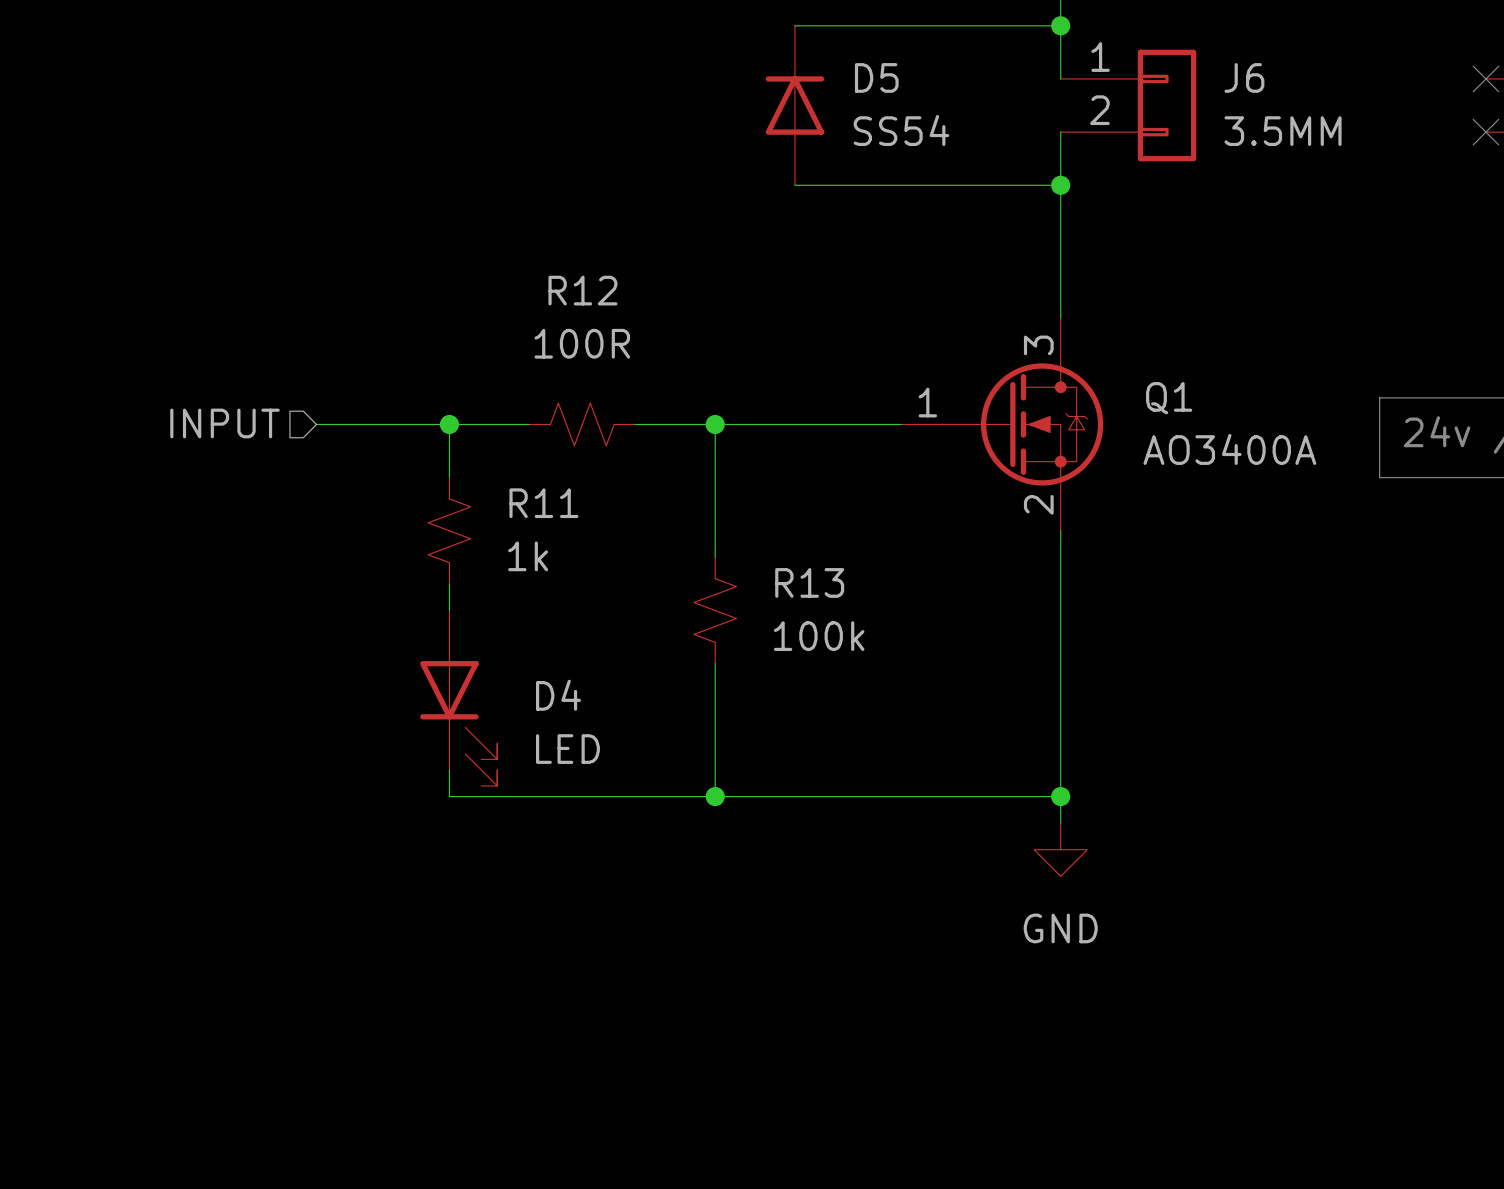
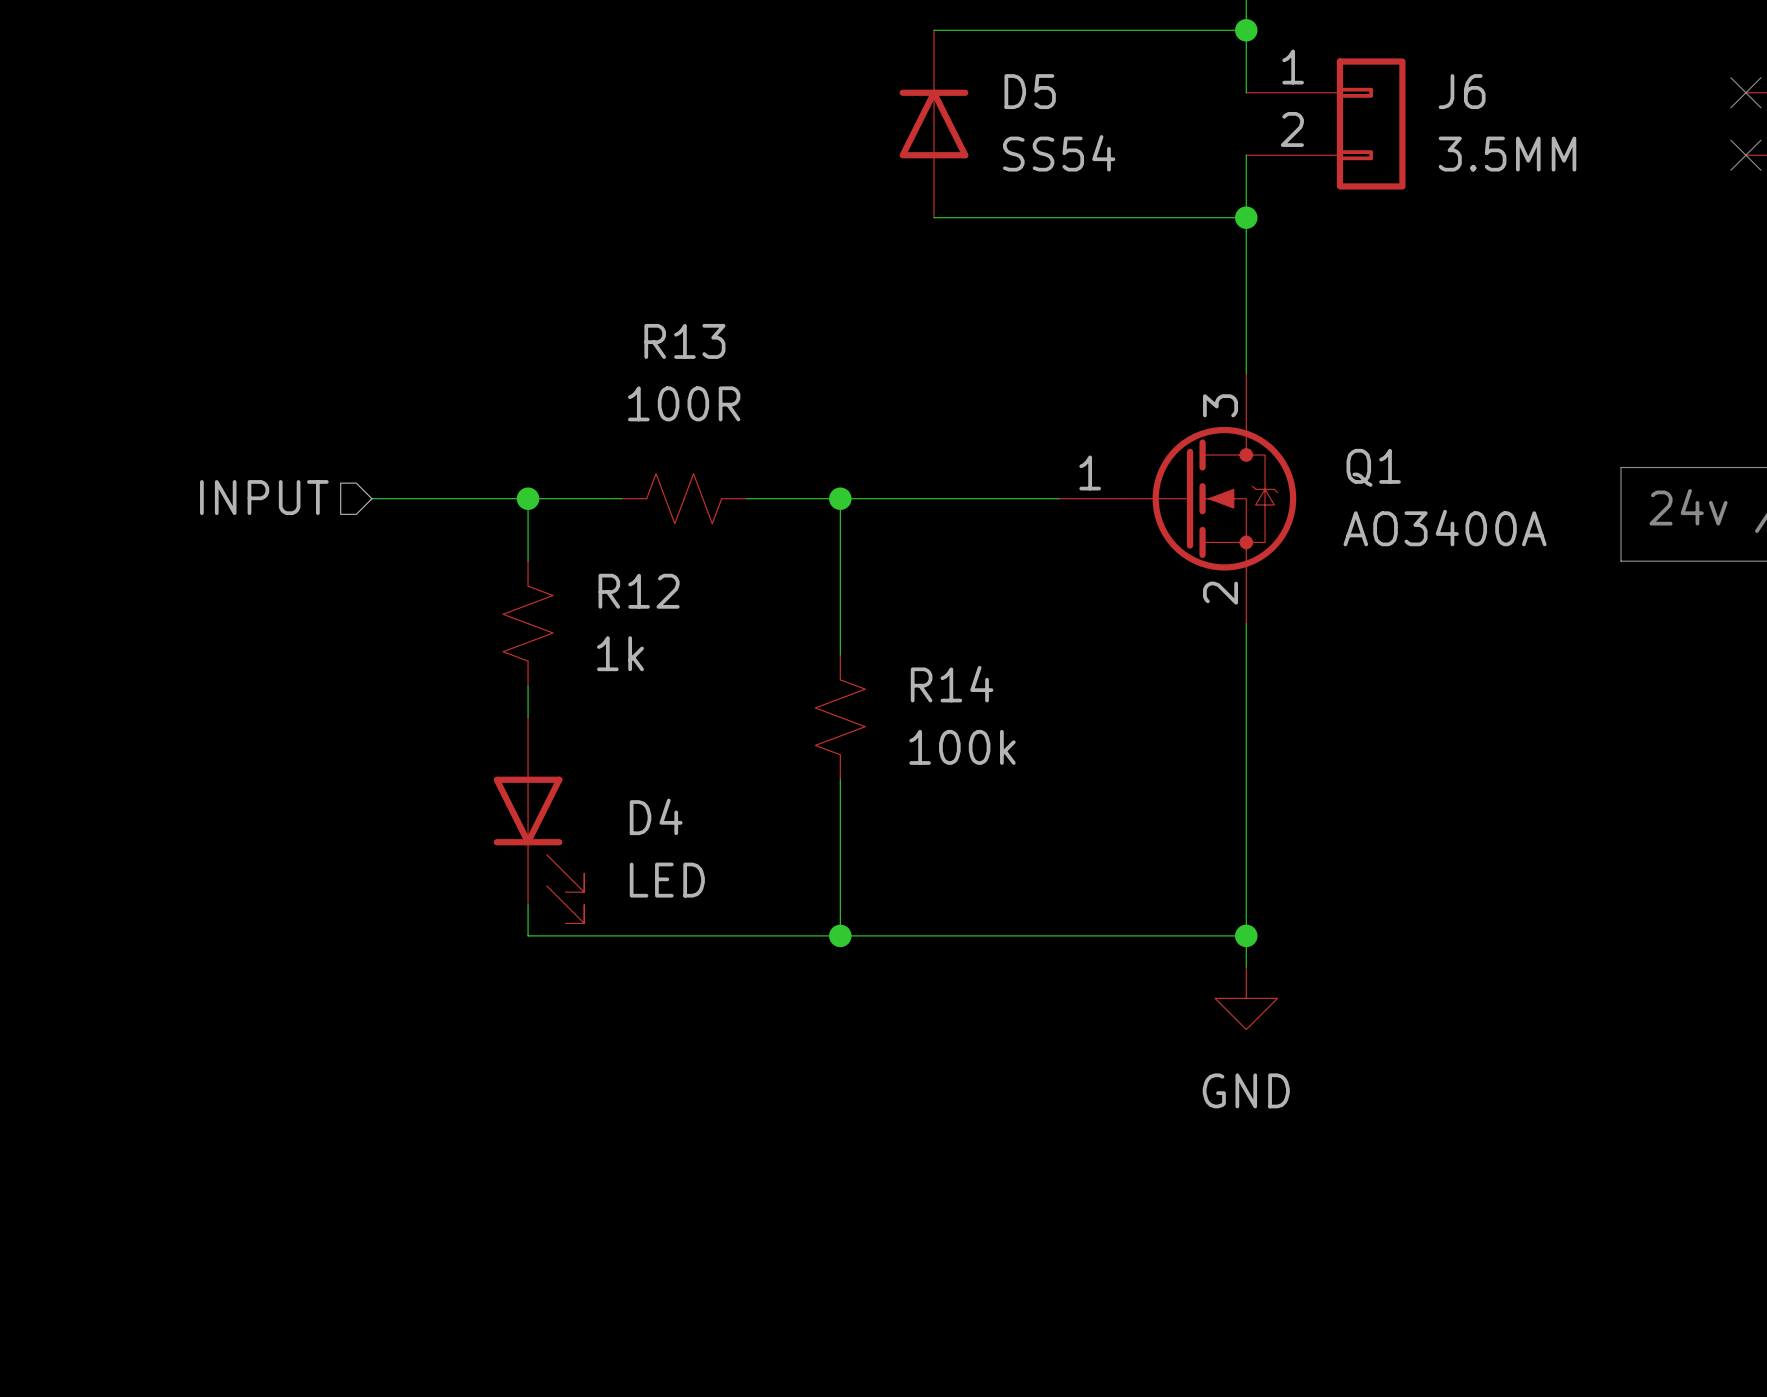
R12 name: R12 (582, 290) -> R13 (684, 341)
R11 name: R11 (543, 503) -> R12 (639, 591)
R13 name: R13 (809, 582) -> R14 (952, 684)

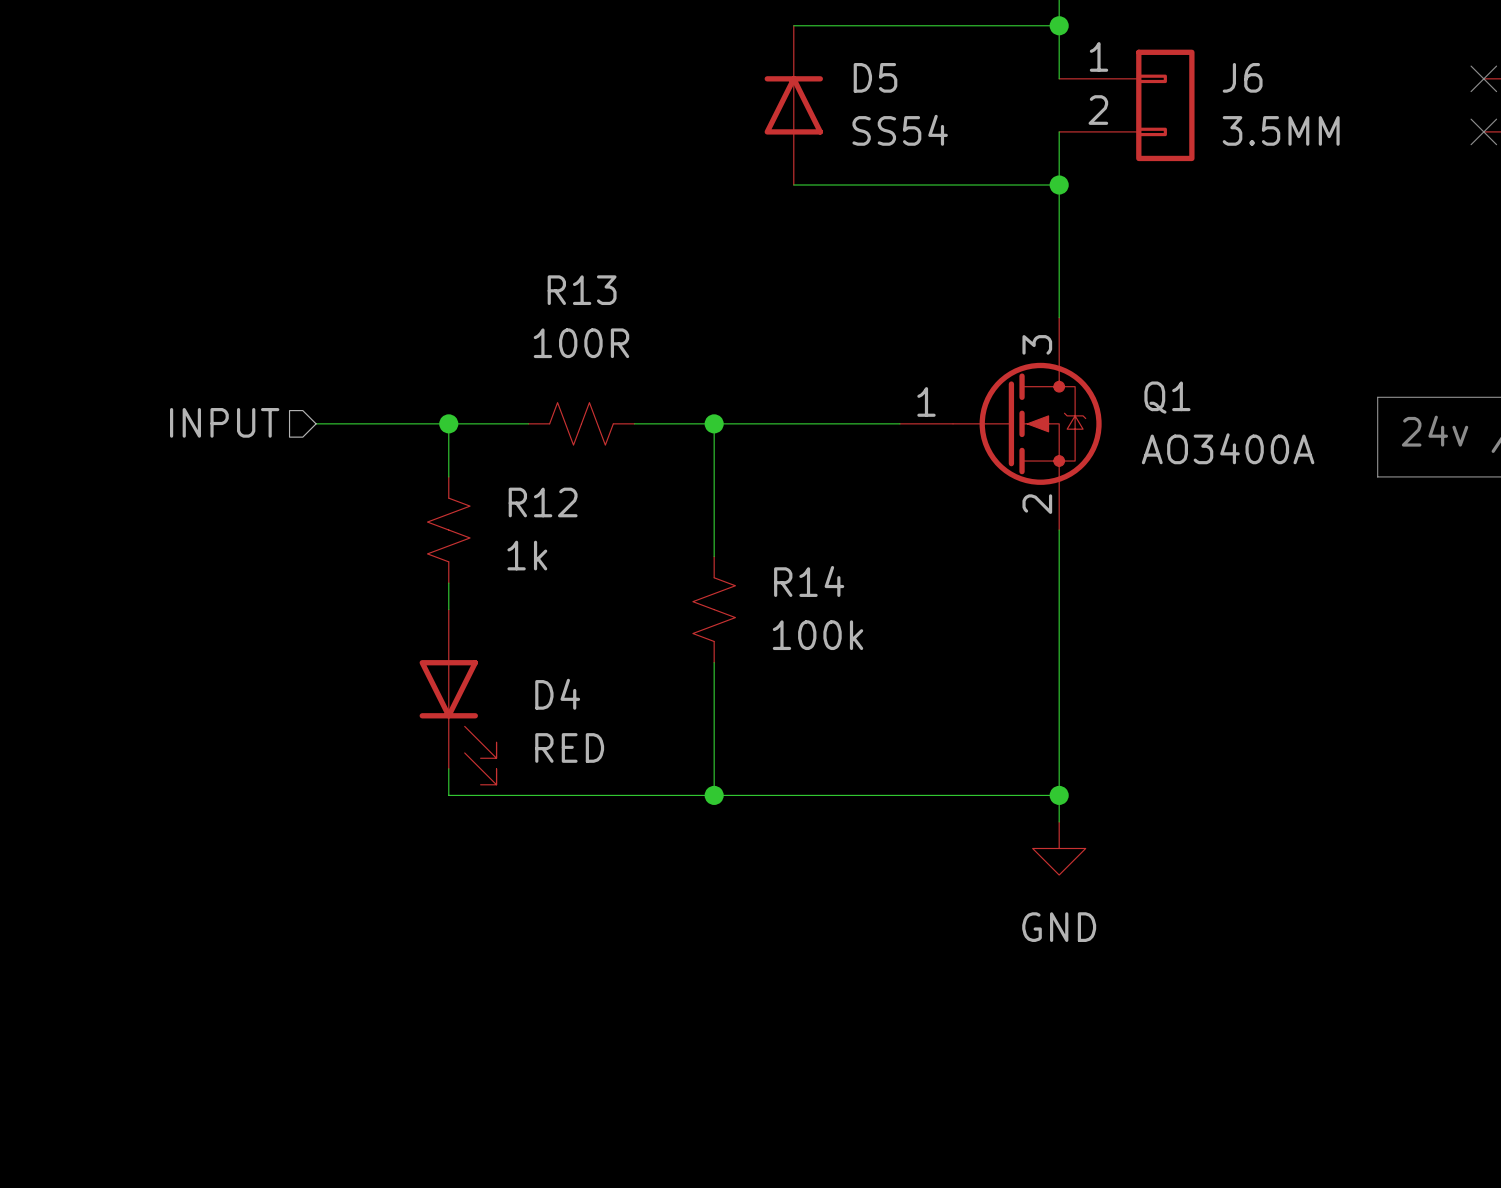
D4 value: LED (667, 880) -> RED (569, 747)

